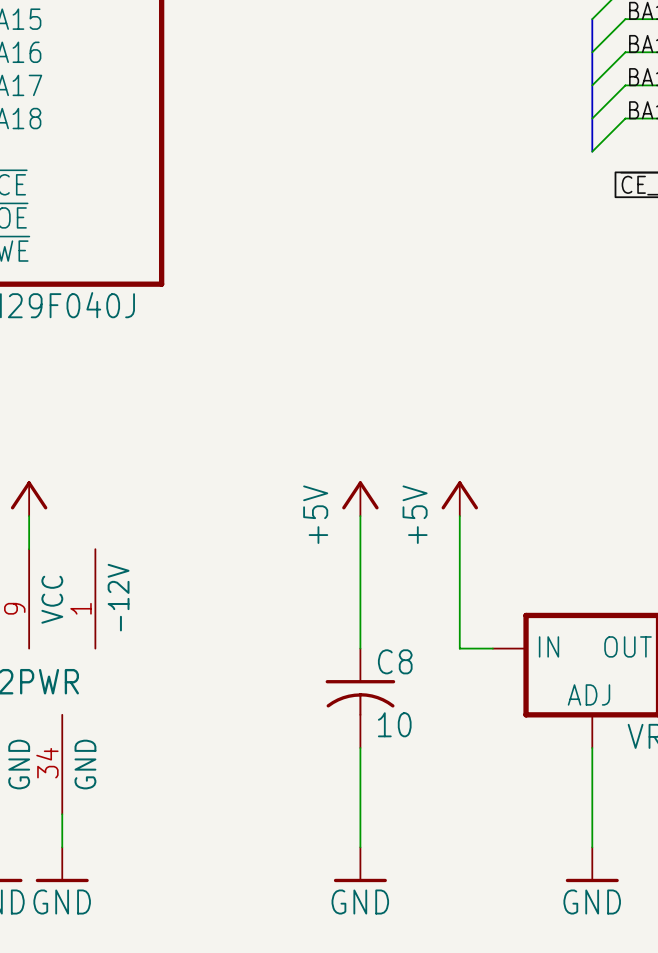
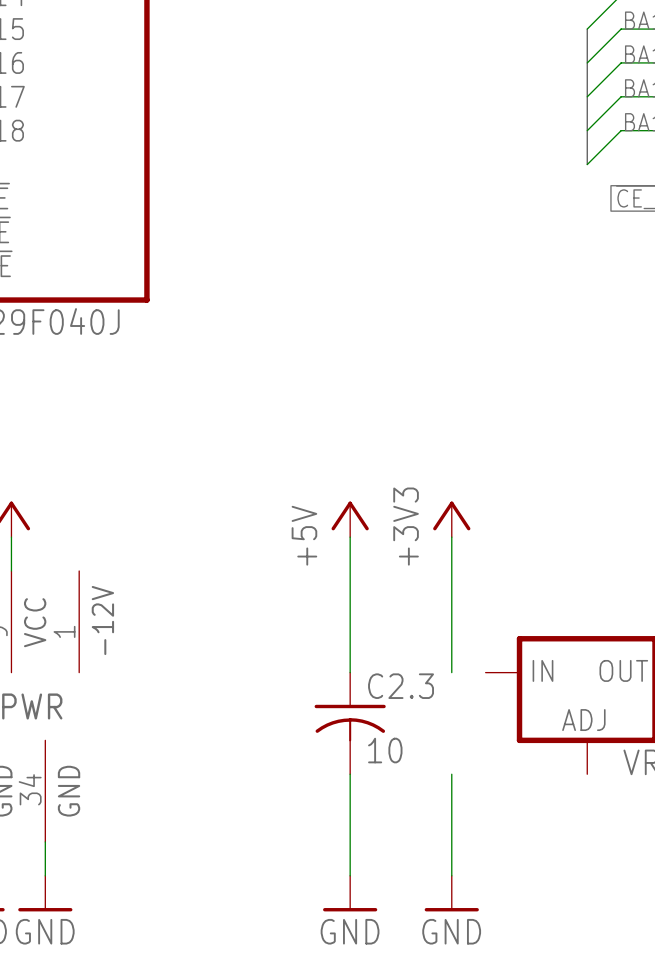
power symbol: +5V (459, 498) -> +3V3 (451, 519)
wire: (459, 648) (492, 648) -> none
C8 name: C8 (395, 661) -> C2.3 (401, 686)
wire: (592, 747) (592, 847) -> (451, 774) (451, 875)
power symbol position: GND (592, 864) -> GND (451, 893)

